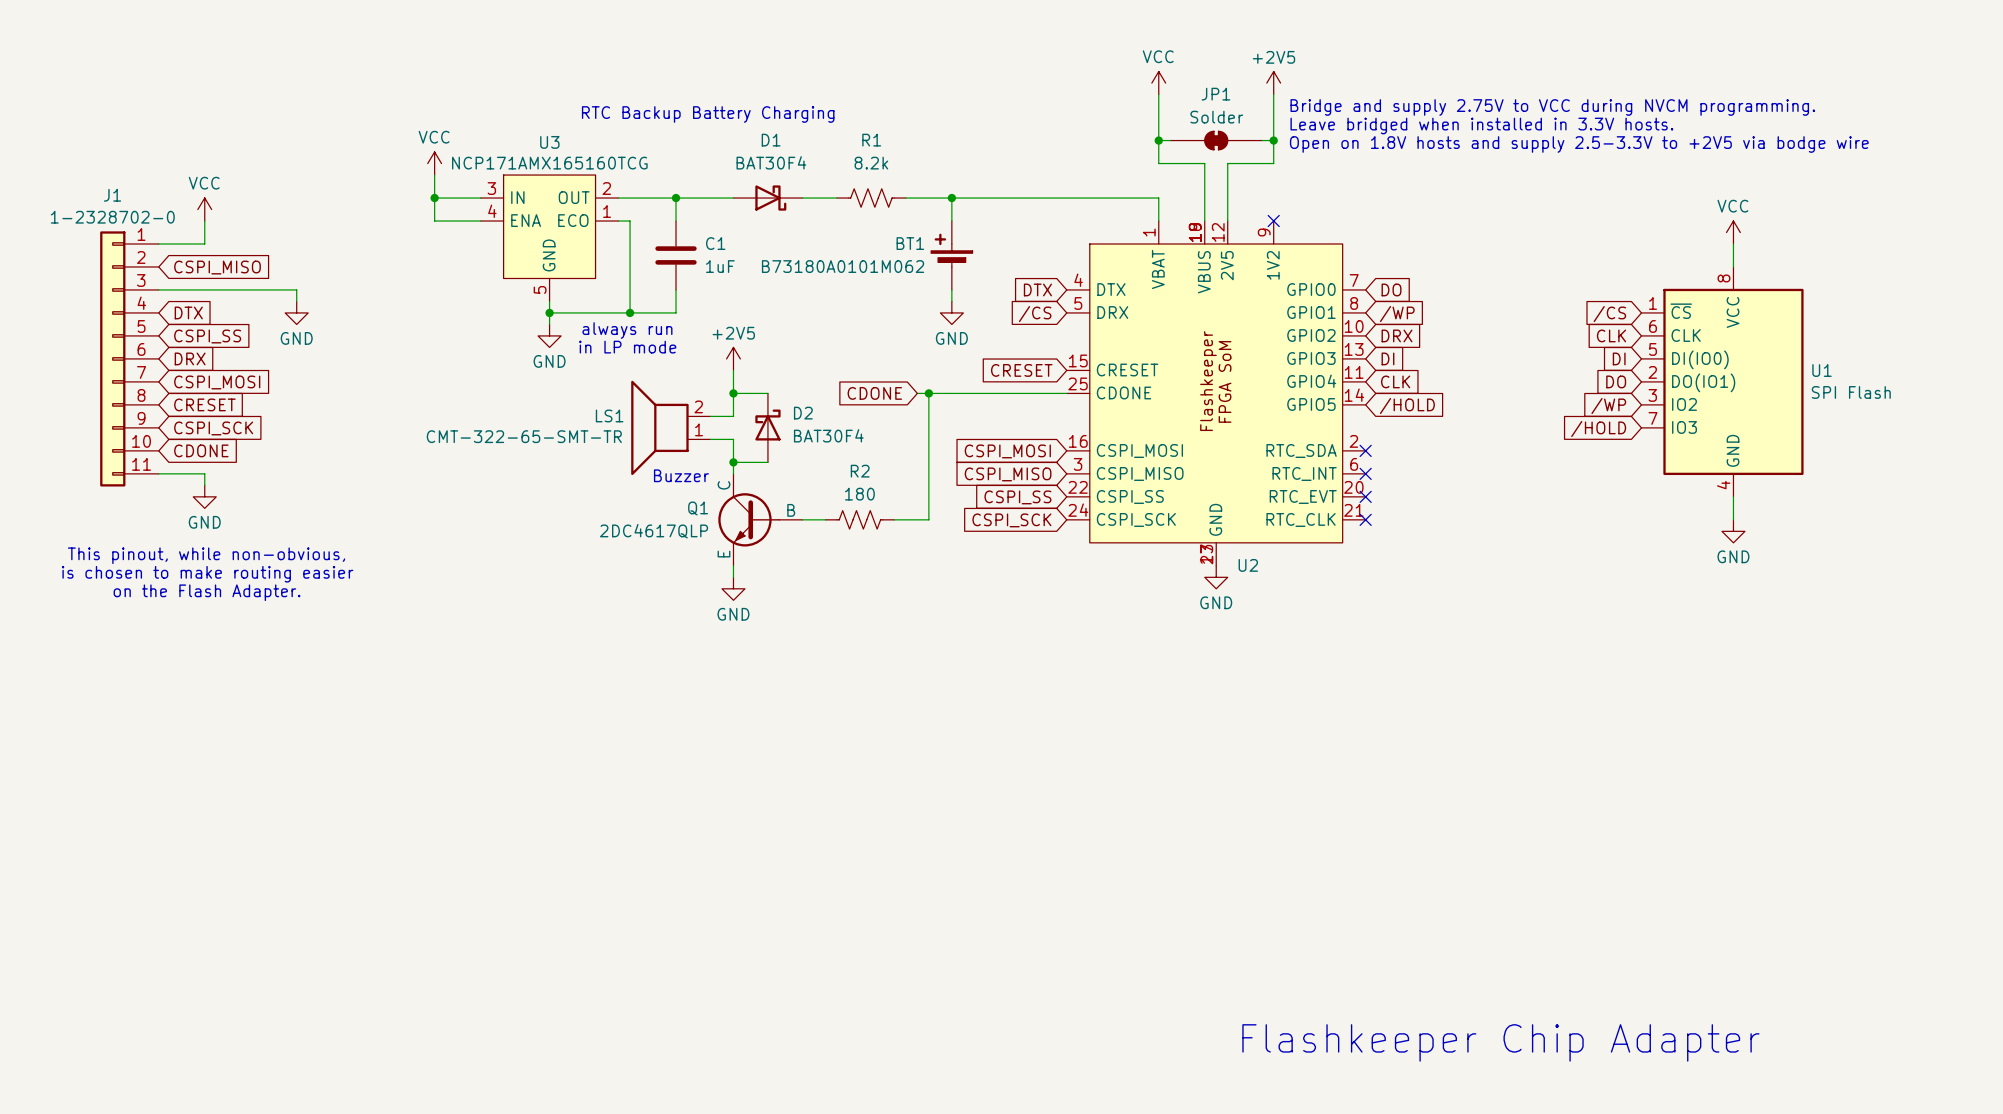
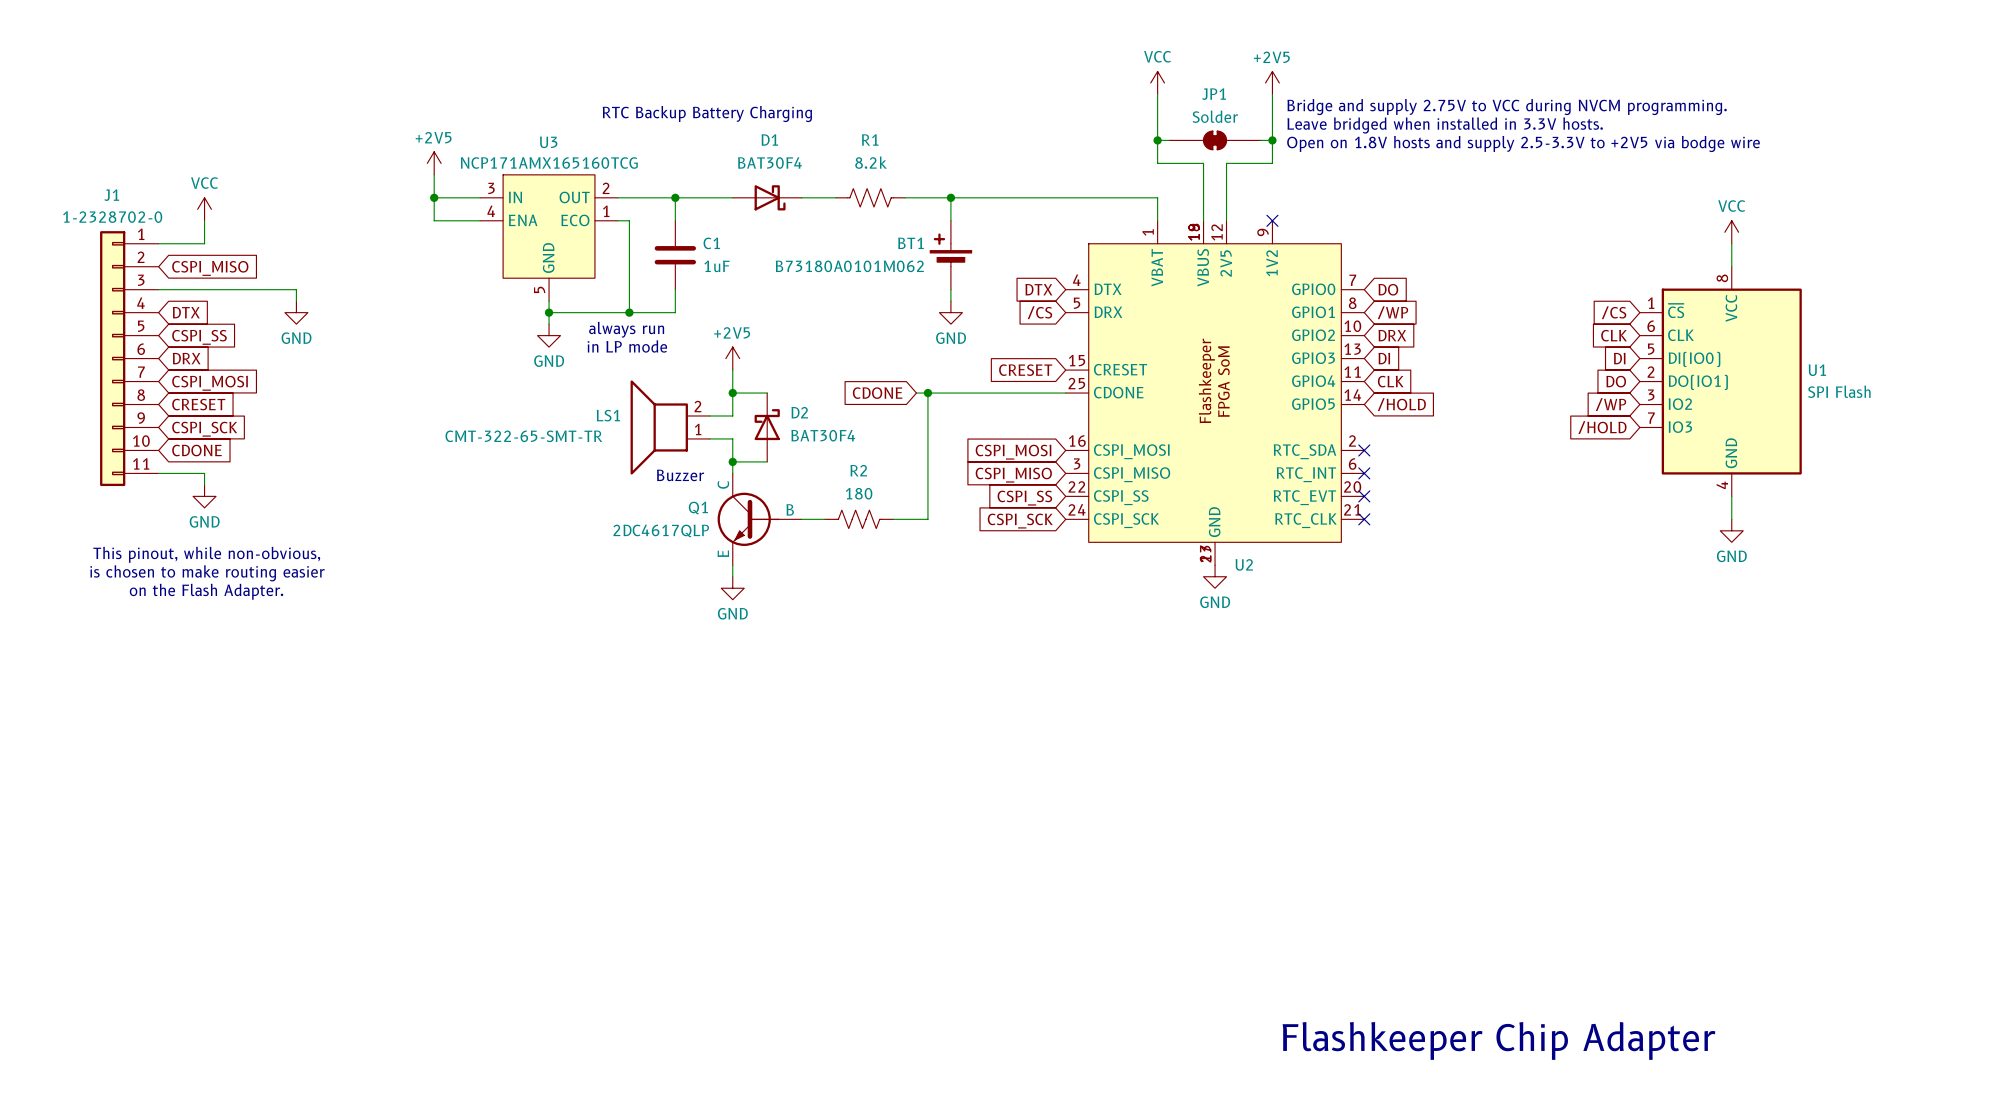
power symbol: VCC (434, 163) -> +2V5 (434, 163)

